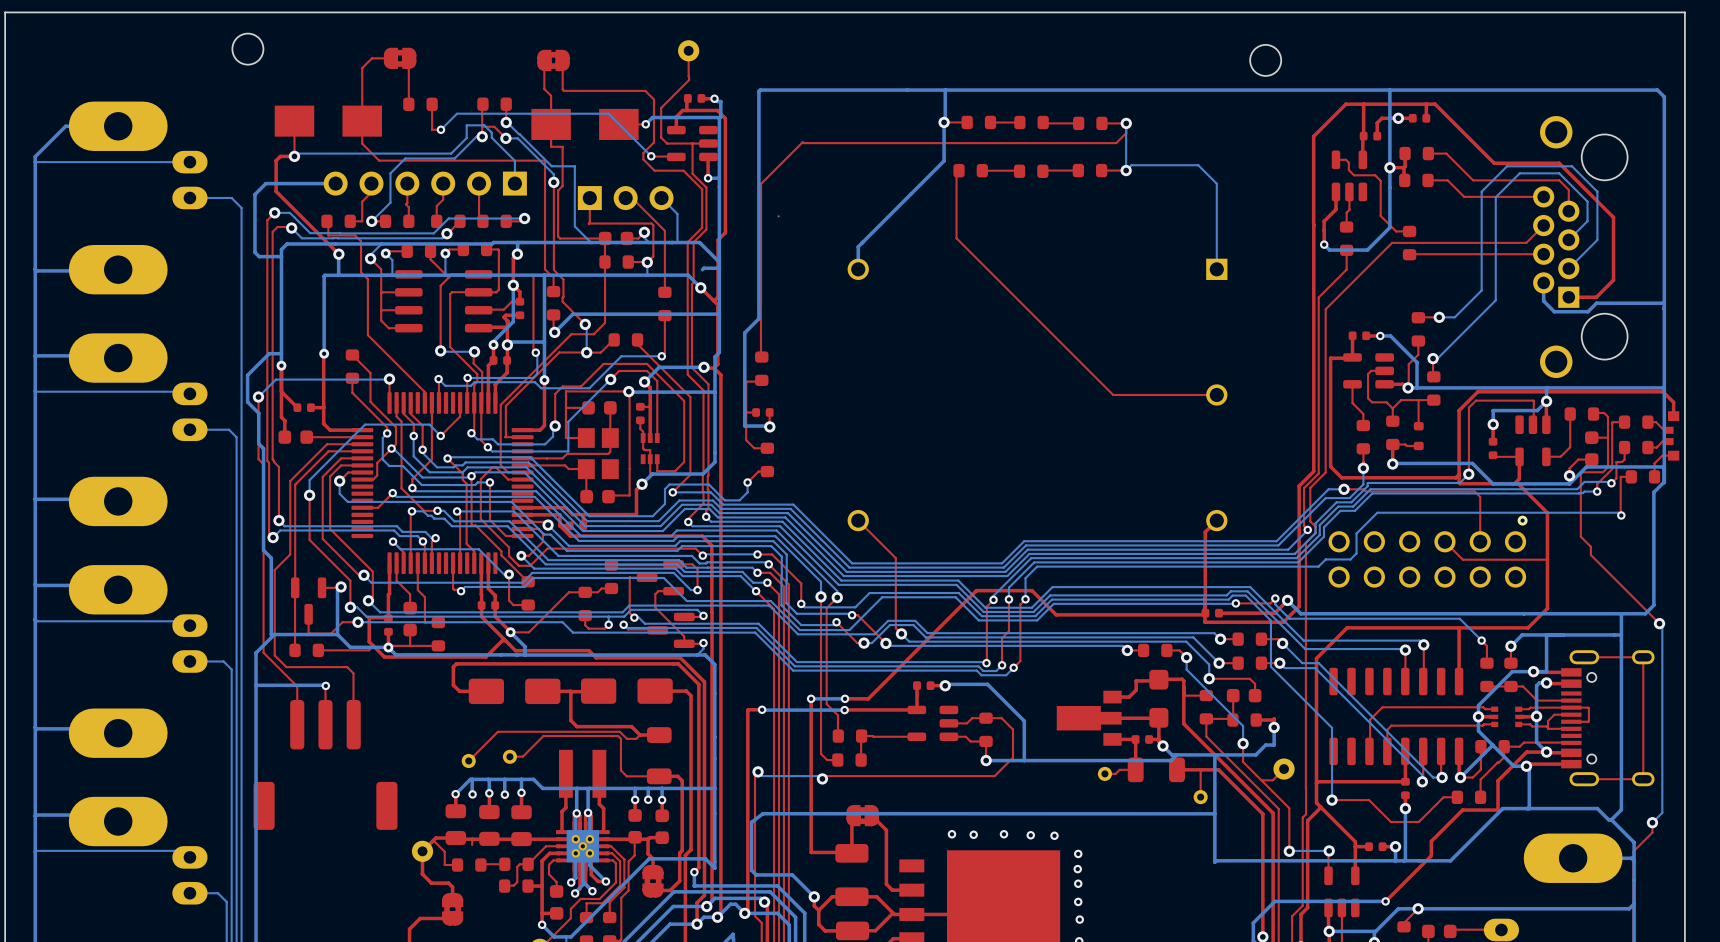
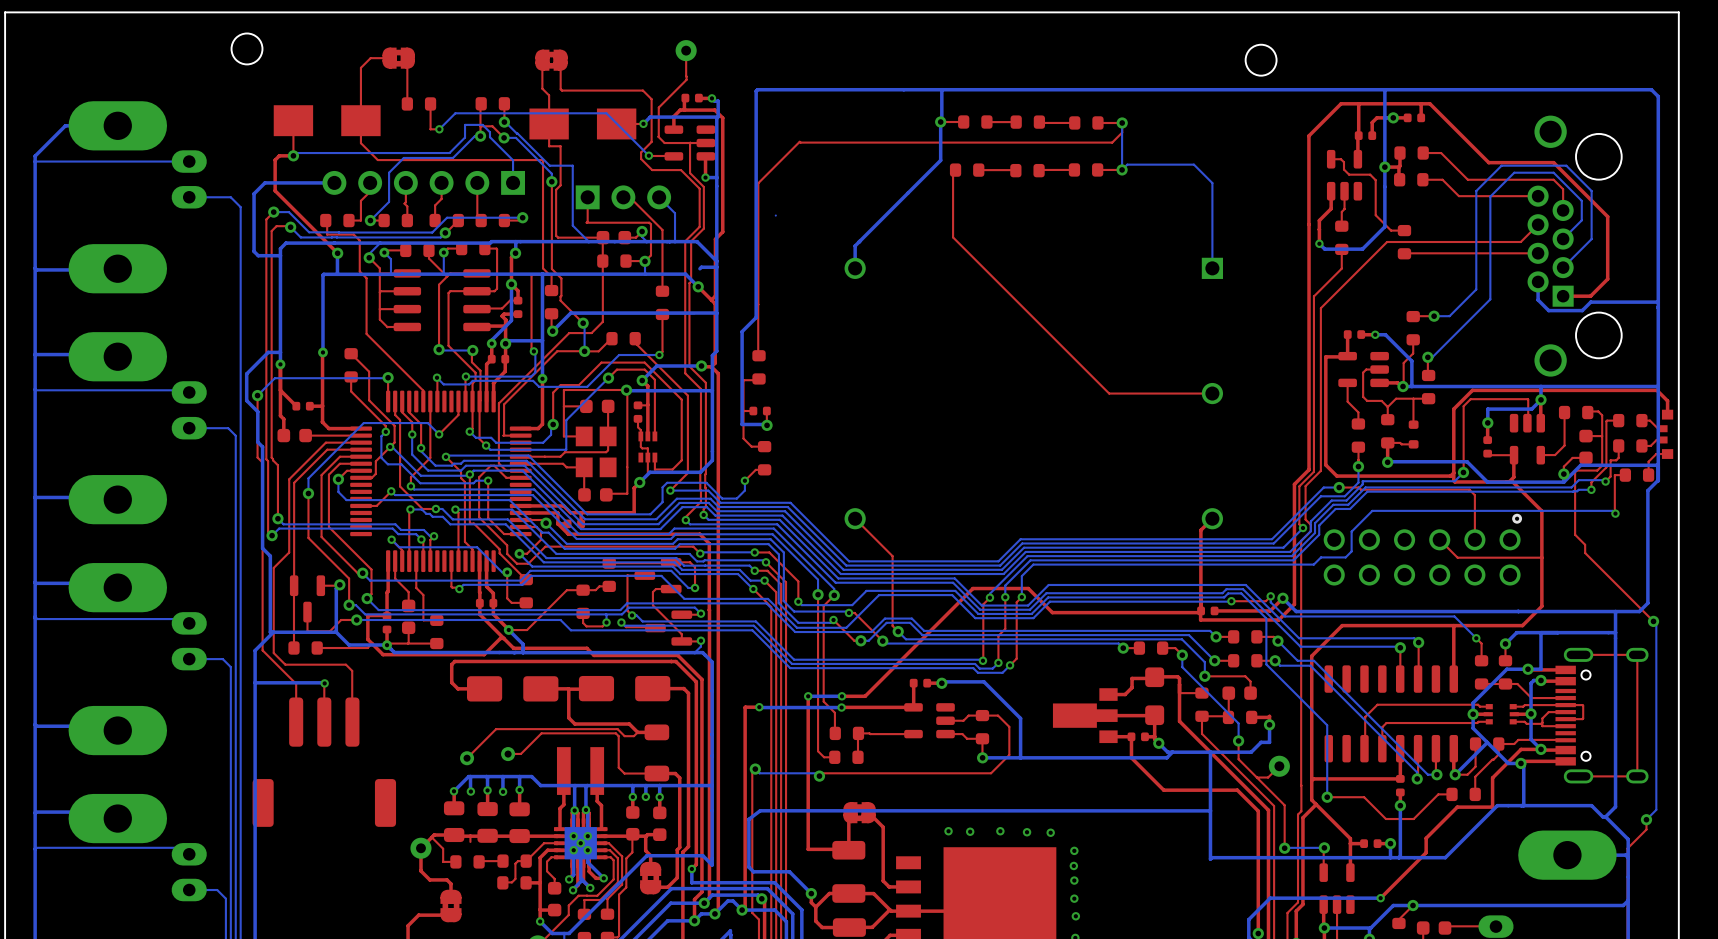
top track: (1135, 739) (1135, 769) (1119, 769) (1115, 773) (1104, 773) -> none
part: (1156, 769) -> none
top track: (1176, 769) (1218, 769) (1241, 793) -> (1131, 736) (1131, 757) (1163, 790) (1237, 790)
top track: (1200, 769) (1200, 797) -> none
part: (1104, 773) -> none
part: (1200, 797) -> none

